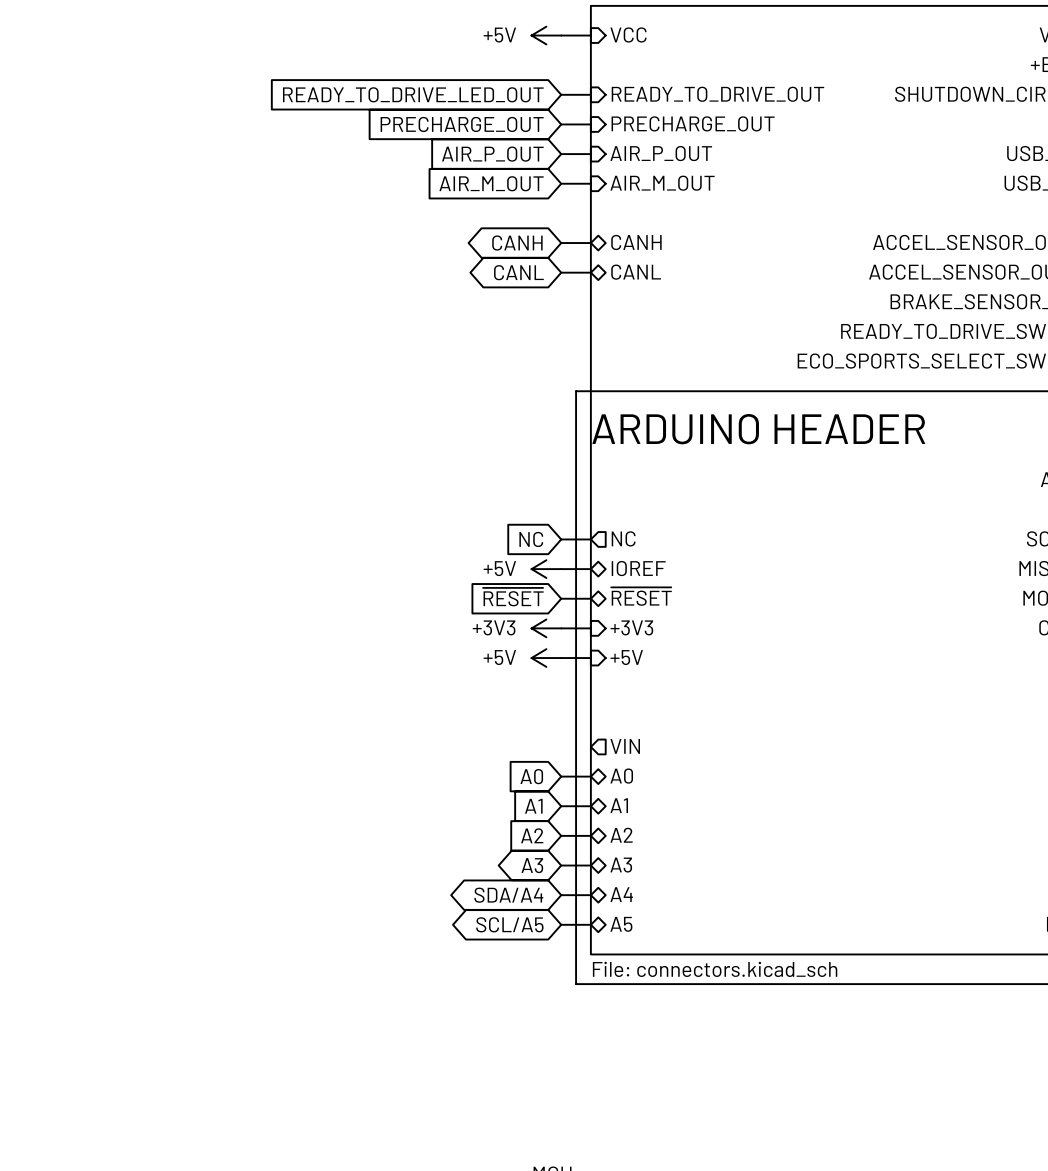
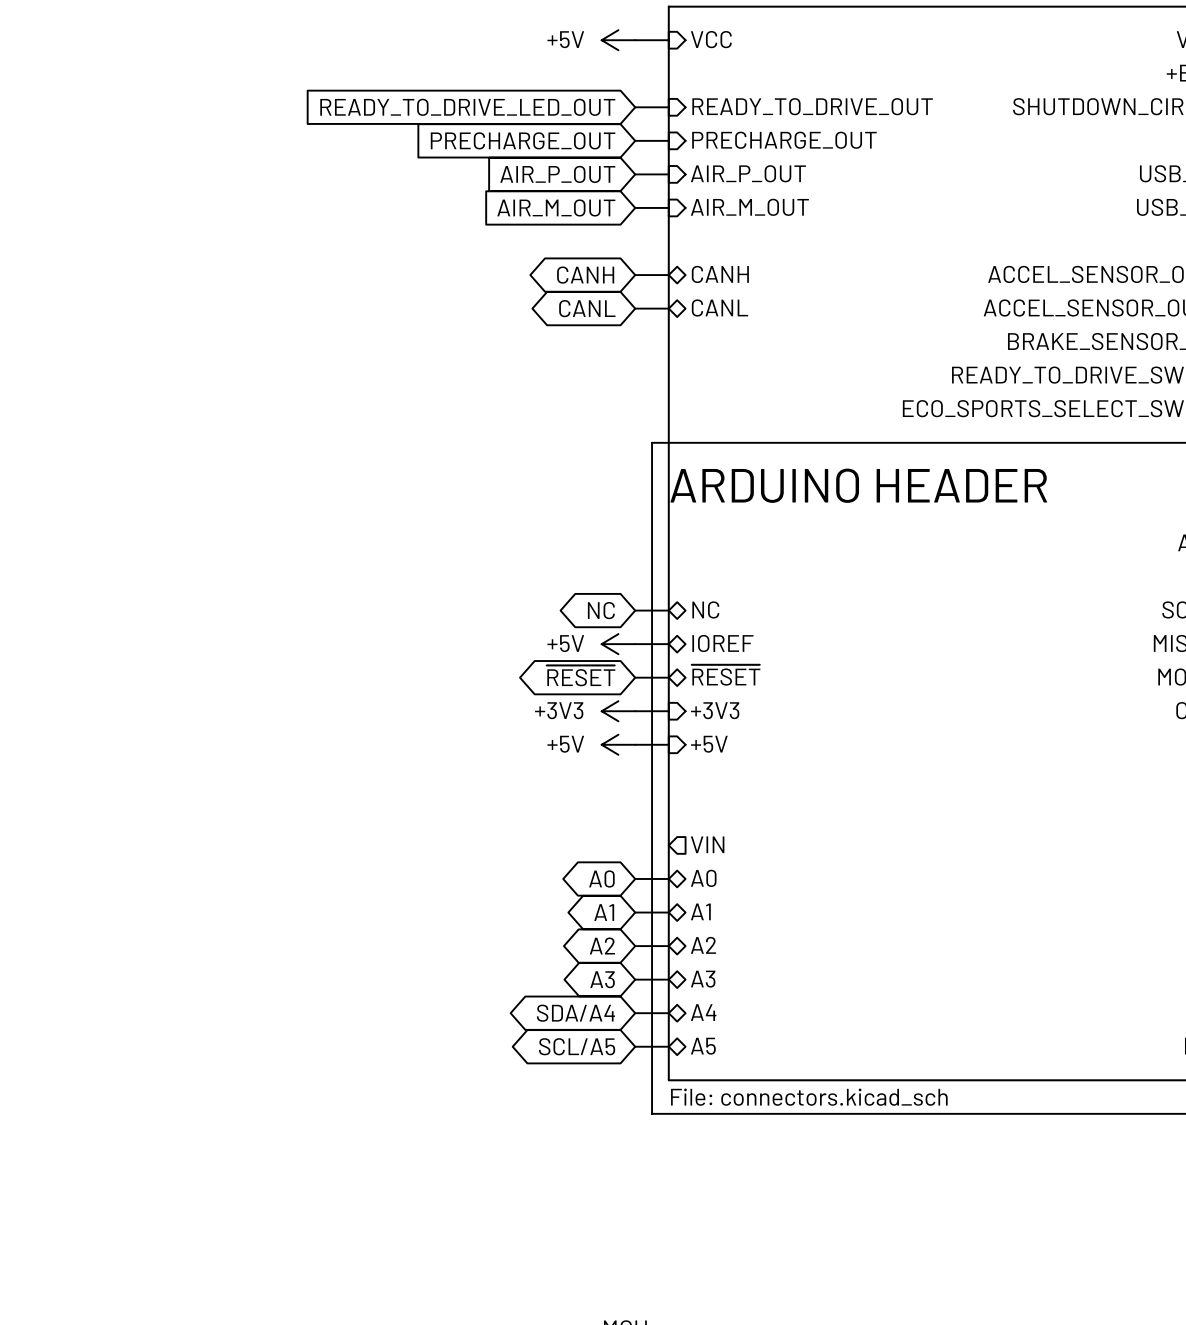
sheet pin shape: output (623, 538) -> bidirectional (705, 609)
global label shape: input (531, 539) -> bidirectional (601, 610)
global label shape: input (513, 597) -> bidirectional (581, 675)
global label shape: input (531, 776) -> bidirectional (601, 879)
global label shape: input (533, 806) -> bidirectional (604, 912)
global label shape: input (532, 835) -> bidirectional (602, 945)

